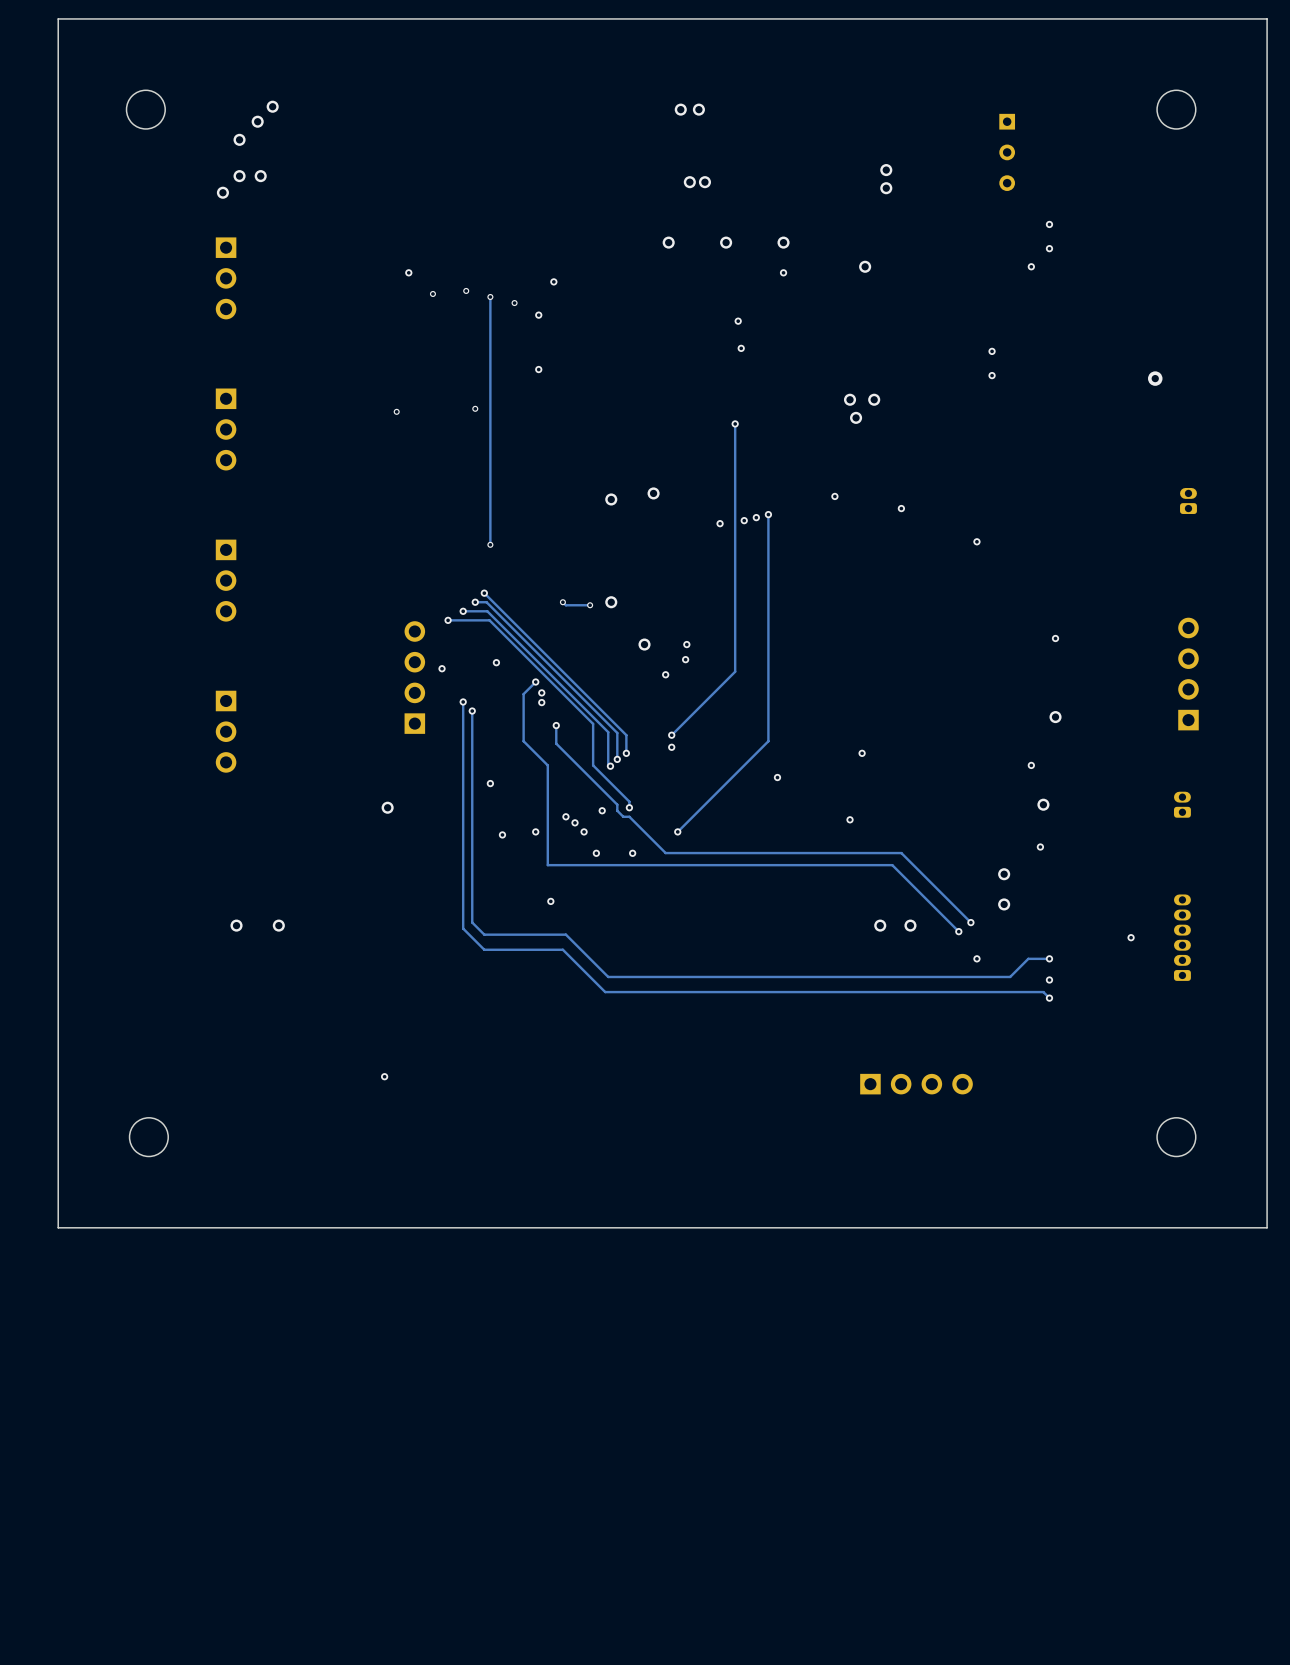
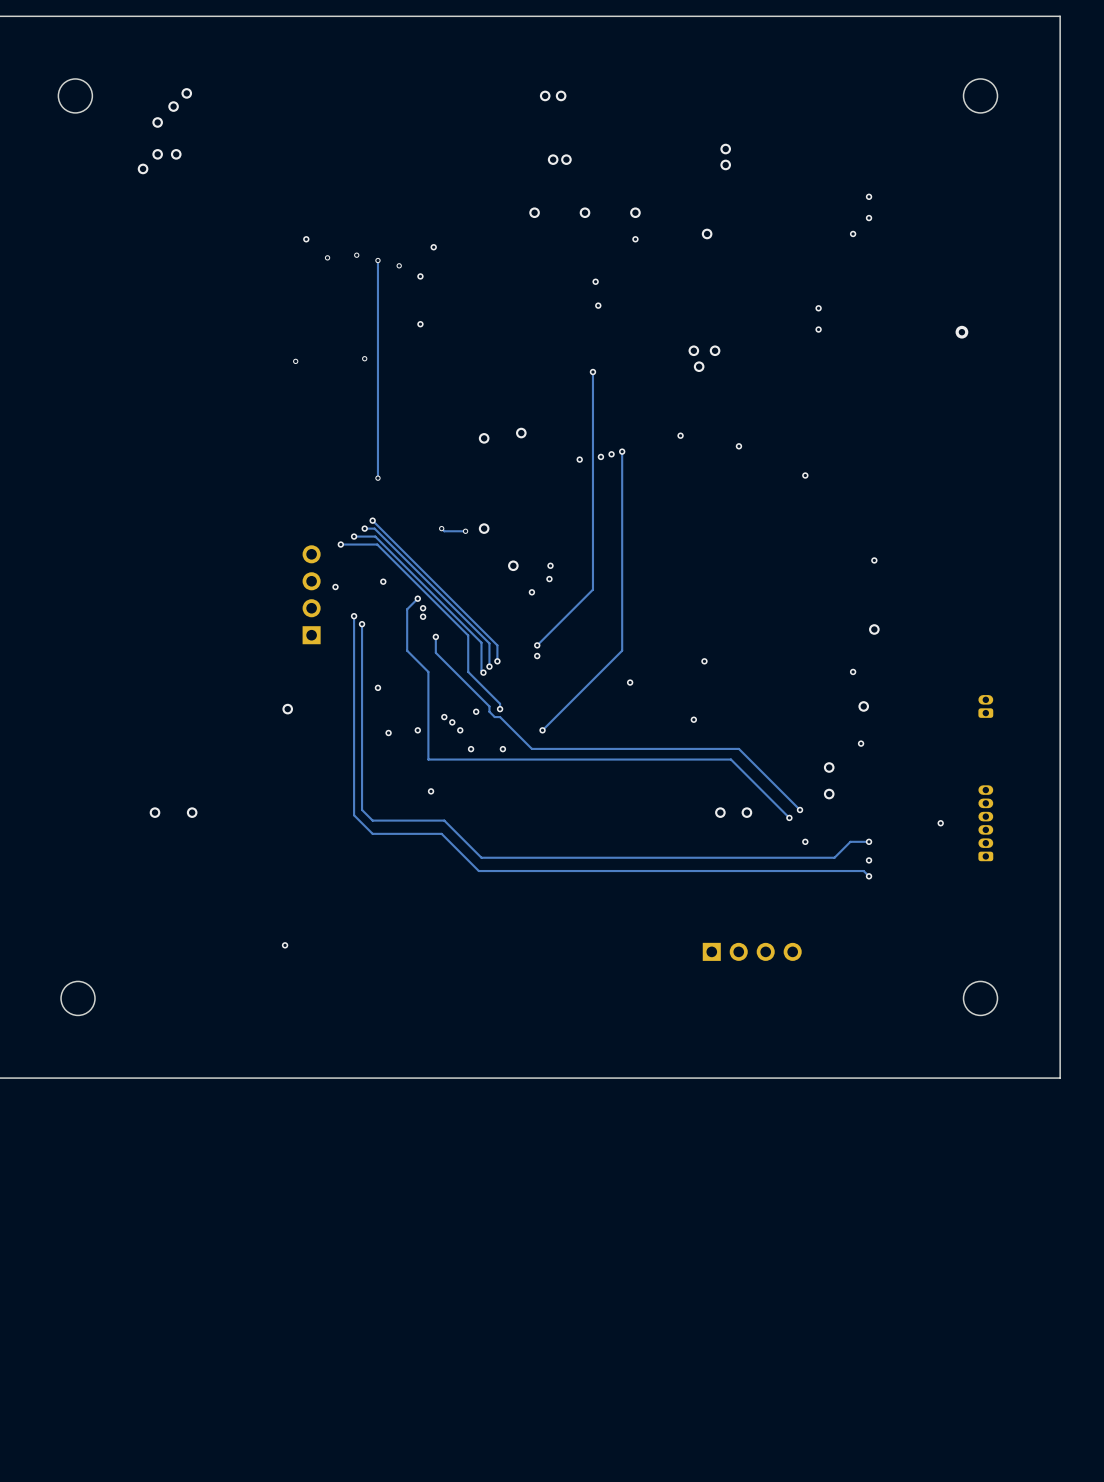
part: (1007, 152) -> none
part: (226, 278) -> none
part: (226, 429) -> none
part: (1188, 500) -> none
part: (226, 580) -> none
part: (1188, 674) -> none
part: (226, 731) -> none

